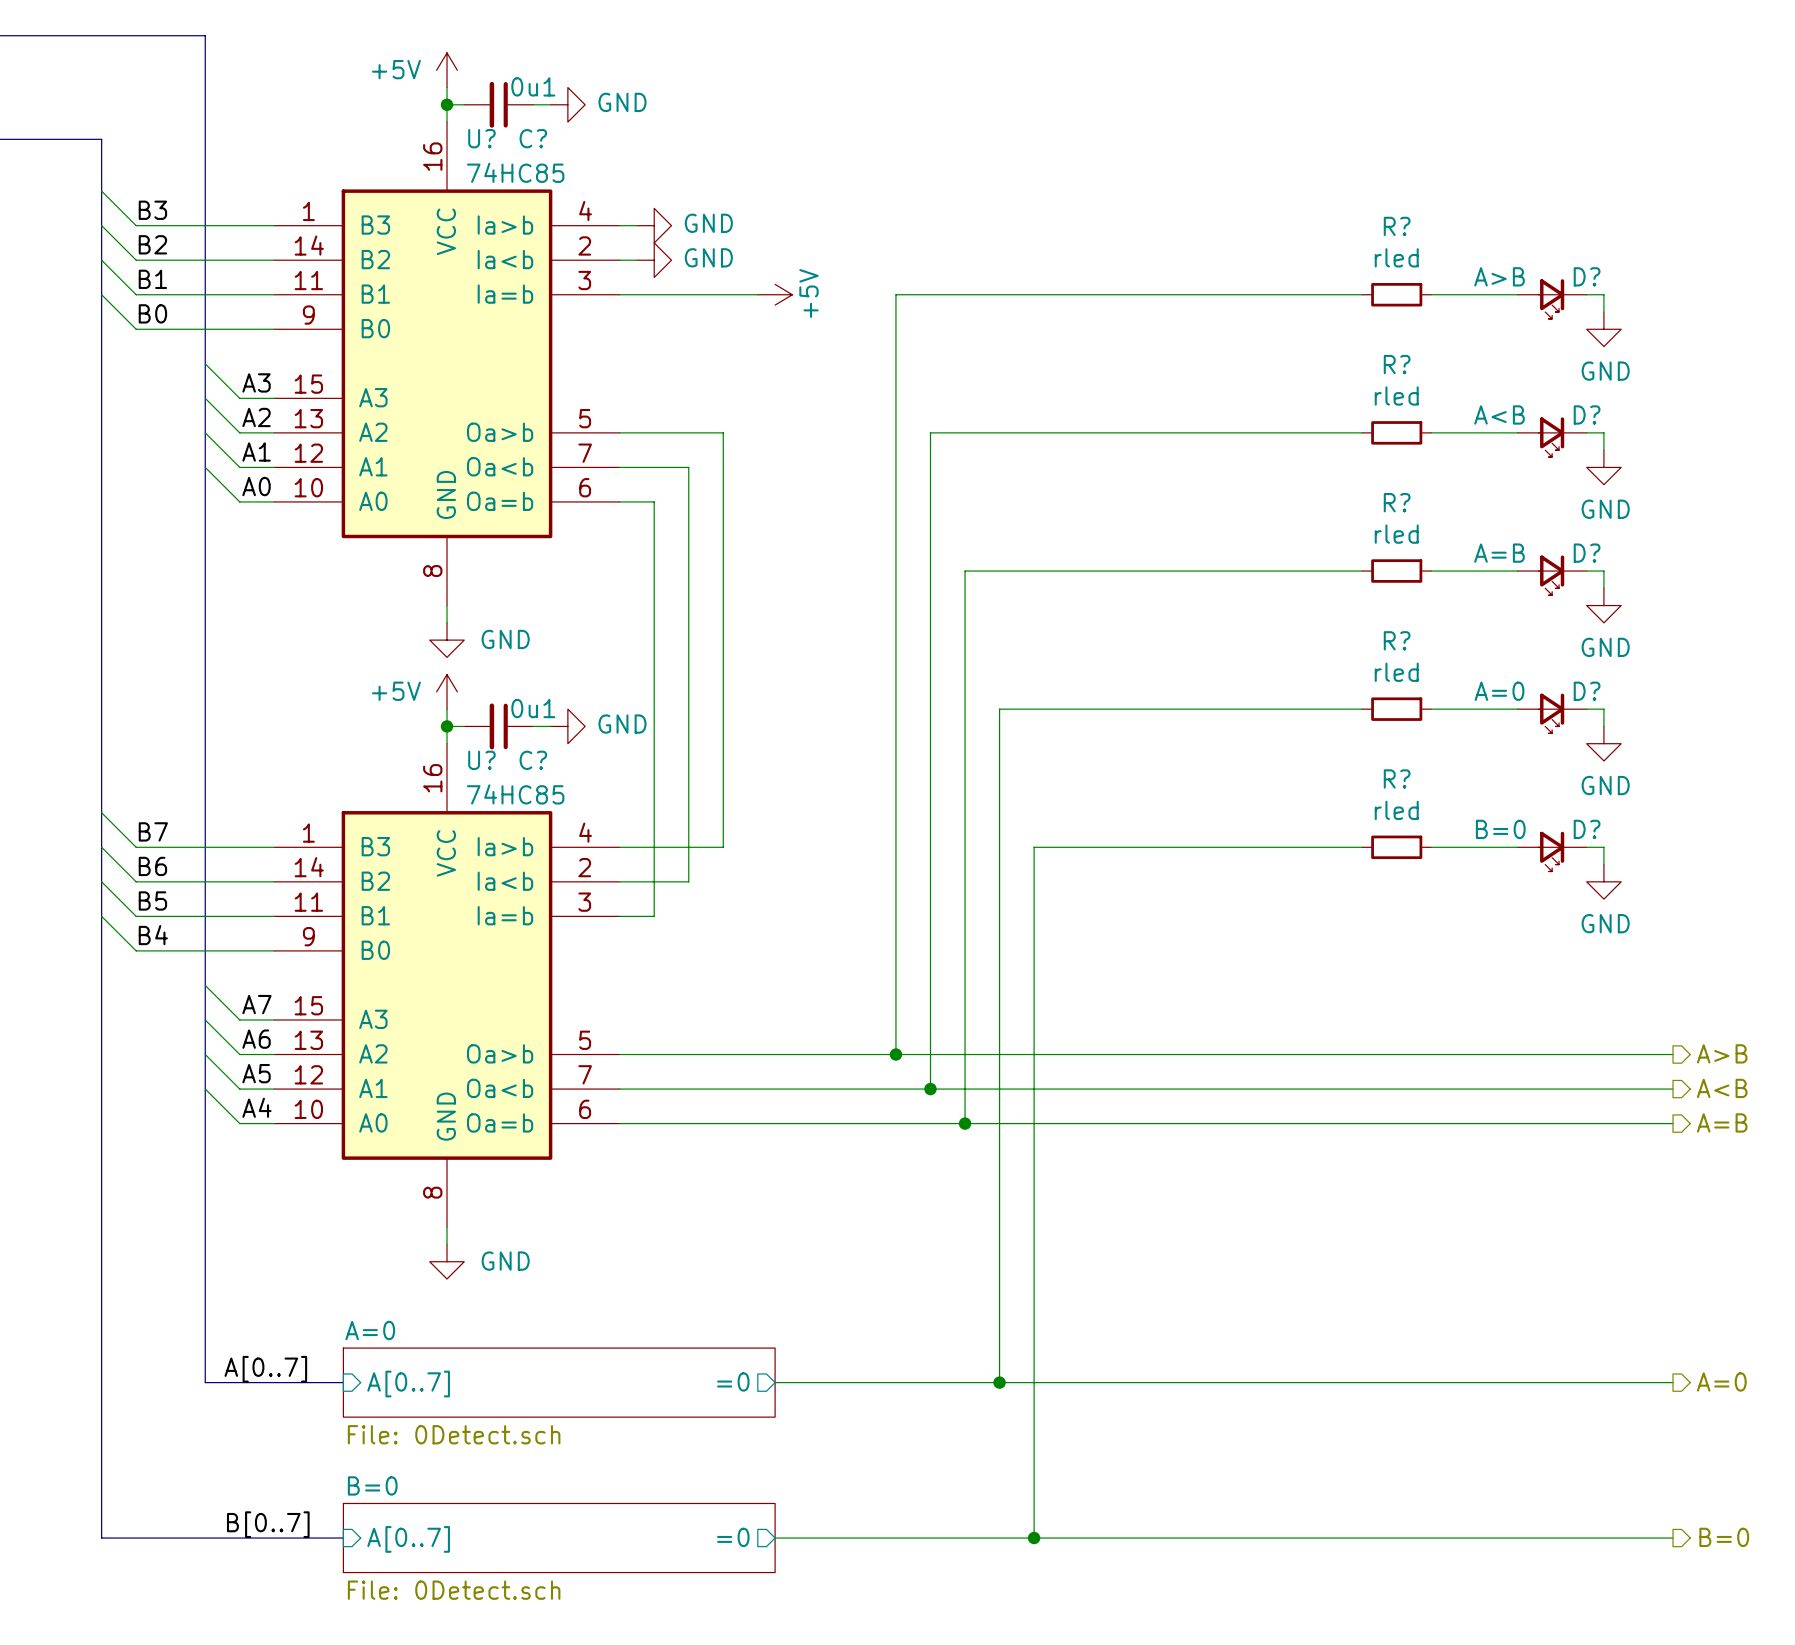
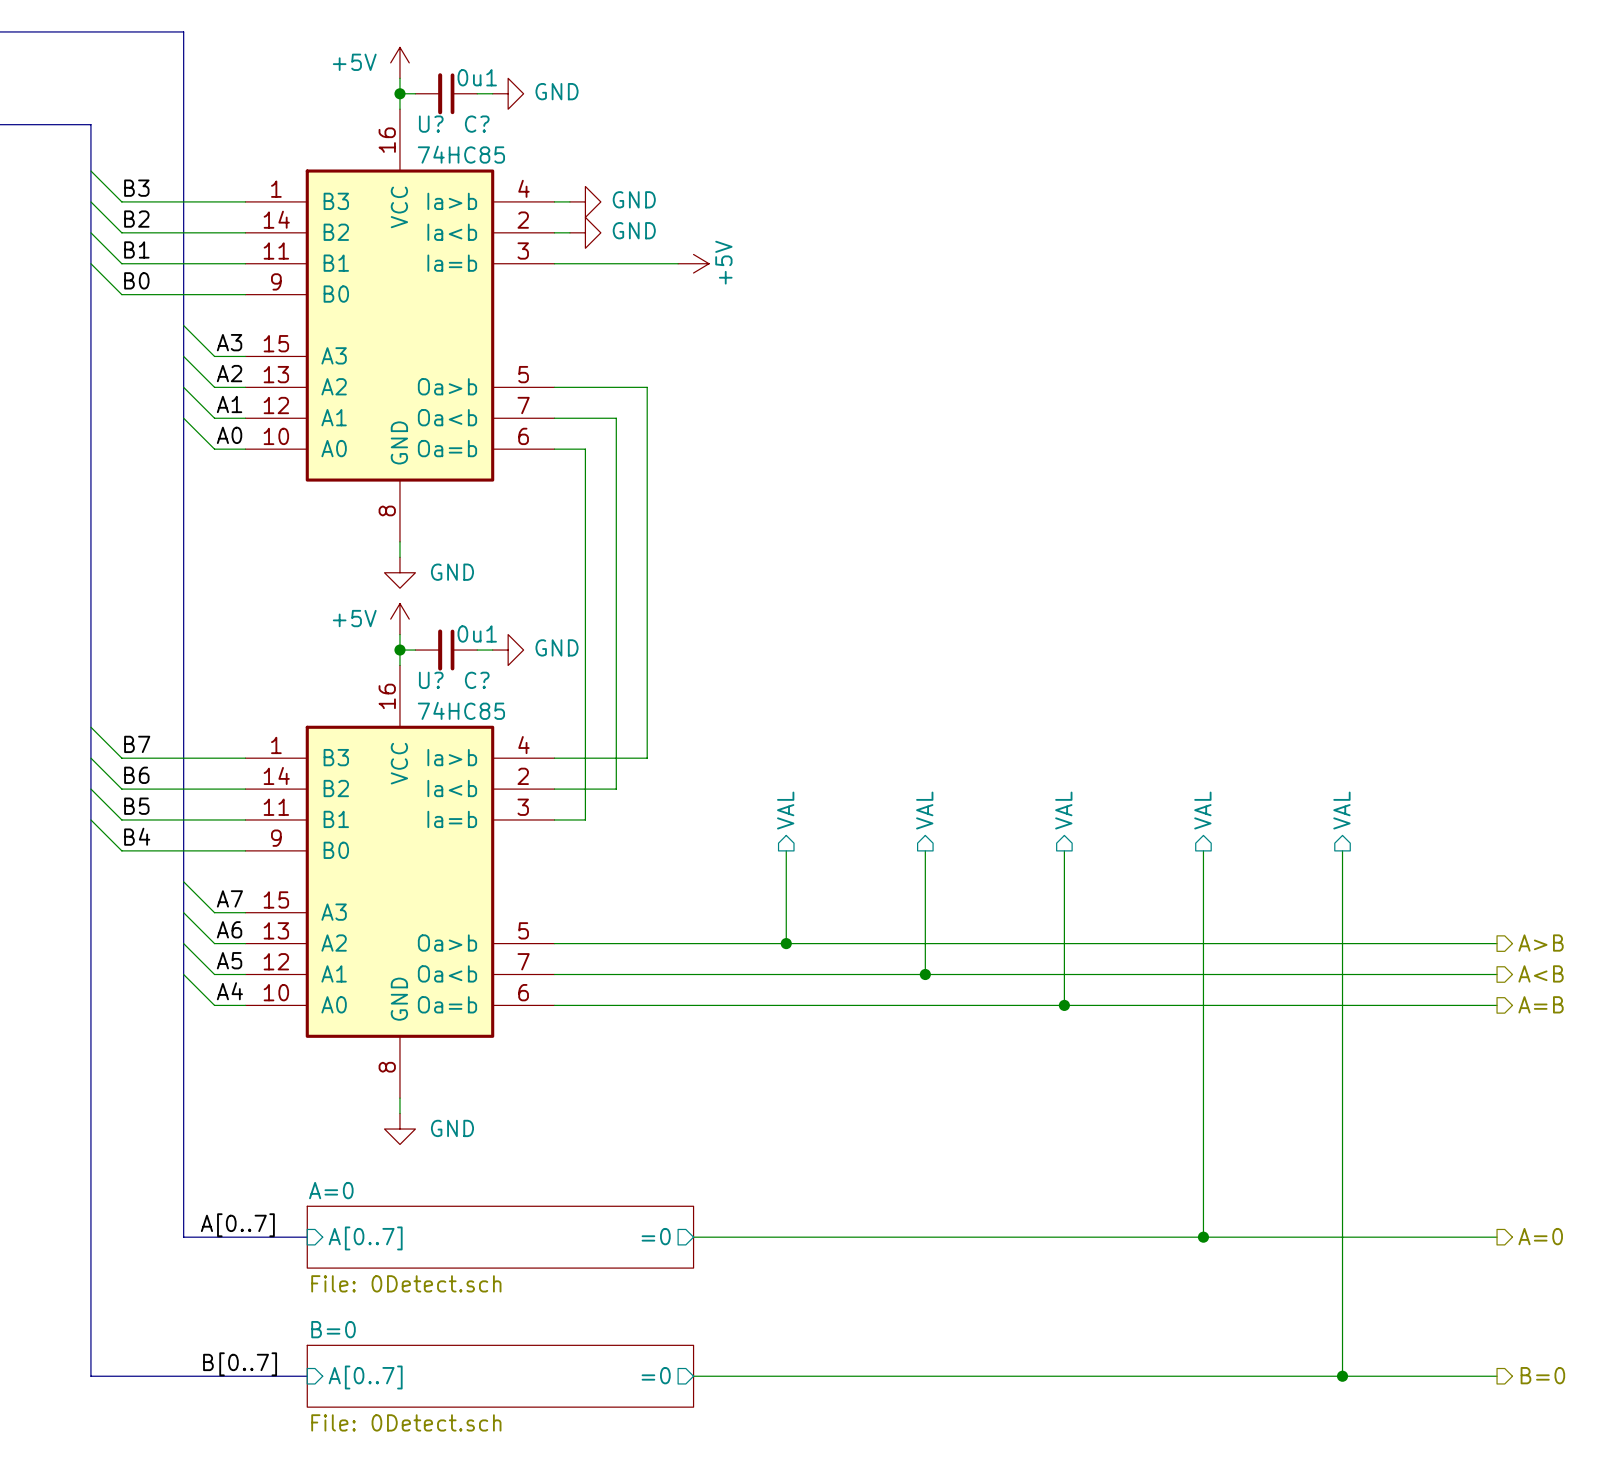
wire: (1362, 294) (895, 294) (895, 1054) -> none
R?: rled (1396, 294) -> none
wire: (1431, 294) (1517, 294) -> none
wire: (1586, 294) (1603, 294) (1603, 312) -> none
D?: A>B (1552, 299) -> none
power symbol: GND (1603, 329) -> none
wire: (1362, 432) (930, 432) (930, 1089) -> none
R?: rled (1396, 432) -> none
wire: (1431, 432) (1517, 432) -> none
wire: (1586, 432) (1603, 432) (1603, 450) -> none
D?: A<B (1552, 437) -> none
power symbol: GND (1603, 467) -> none
wire: (1362, 571) (965, 571) (965, 1123) -> none
R?: rled (1396, 571) -> none
wire: (1431, 571) (1517, 571) -> none
wire: (1586, 571) (1603, 571) (1603, 588) -> none
D?: A=B (1552, 575) -> none
power symbol: GND (1603, 605) -> none
wire: (1362, 709) (999, 709) (999, 1382) -> none
R?: rled (1396, 709) -> none
wire: (1431, 709) (1517, 709) -> none
wire: (1586, 709) (1603, 709) (1603, 726) -> none
D?: A=0 (1552, 713) -> none
power symbol: GND (1603, 743) -> none
wire: (1362, 847) (1034, 847) (1034, 950) -> none
R?: rled (1396, 847) -> none
wire: (1431, 847) (1517, 847) -> none
wire: (1586, 847) (1603, 847) (1603, 864) -> none
D?: B=0 (1552, 851) -> none
power symbol: GND (1603, 881) -> none
sheet pin: none -> VAL (785, 810)
sheet pin: none -> VAL (924, 810)
sheet pin: none -> VAL (1063, 810)
sheet pin: none -> VAL (1202, 810)
sheet pin: none -> VAL (1341, 810)
wire: none -> (786, 850) (786, 943)
wire: none -> (1064, 850) (1064, 1005)
wire: none -> (1203, 850) (1203, 1237)
wire: none -> (1342, 850) (1342, 1376)
junction position: (895, 1054) -> (786, 943)
junction: (930, 1089) -> none
wire: (1034, 1089) (1034, 1538) -> none
junction: none -> (925, 974)
junction: (965, 1123) -> none
junction: none -> (1064, 1005)
junction: (999, 1382) -> none
junction: none -> (1203, 1237)
junction: (1034, 1538) -> none
junction: none -> (1342, 1376)

